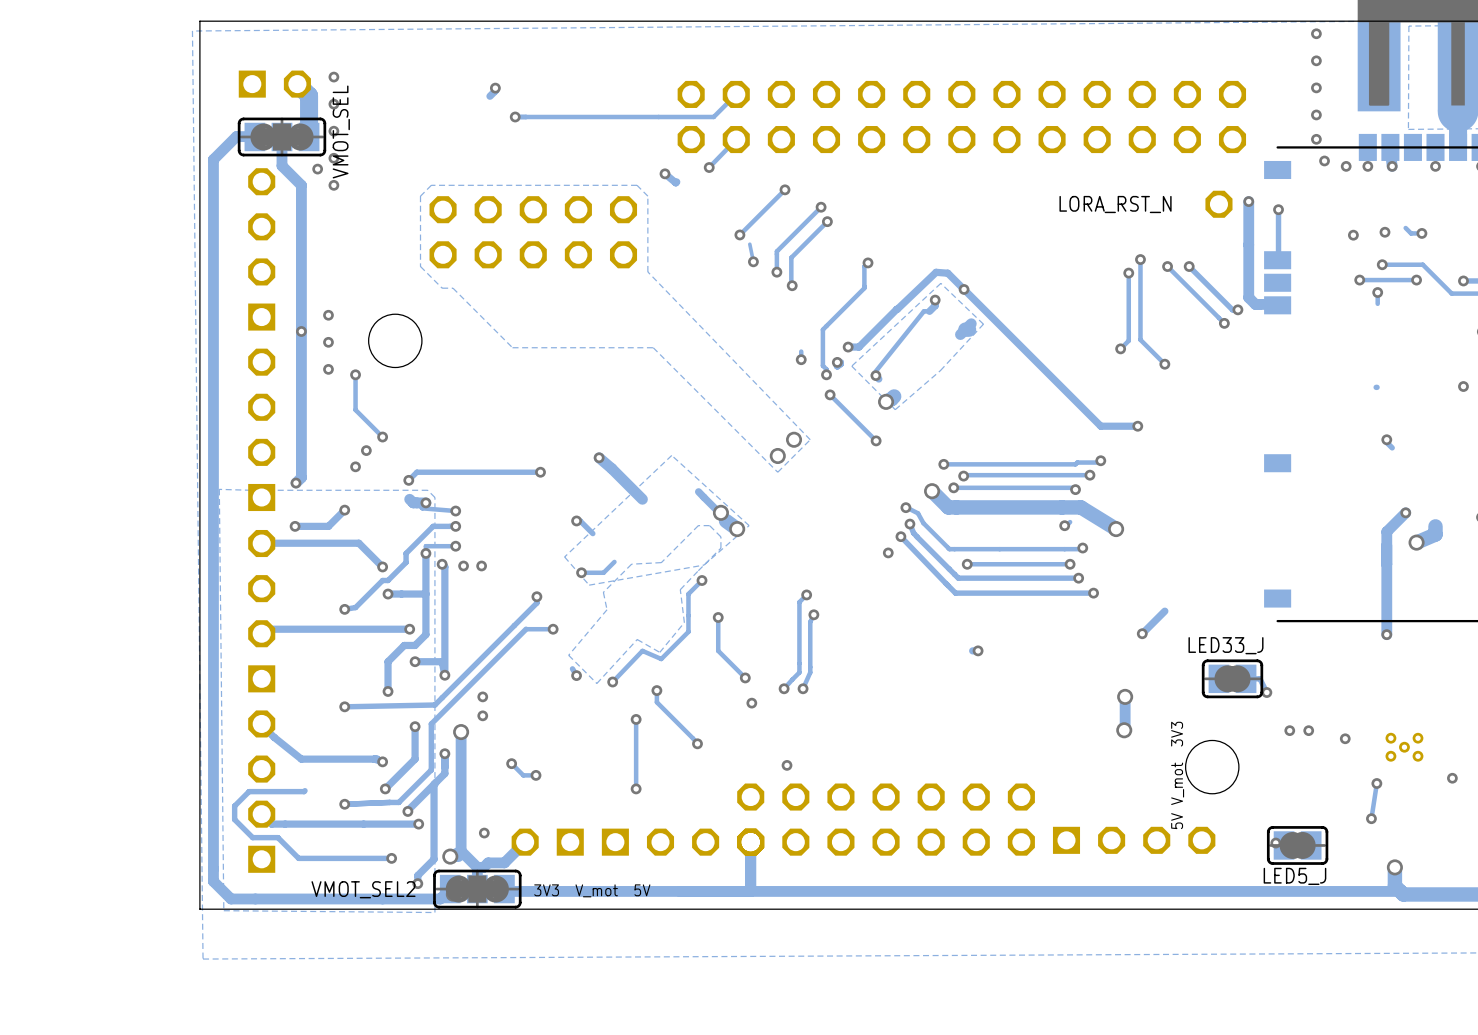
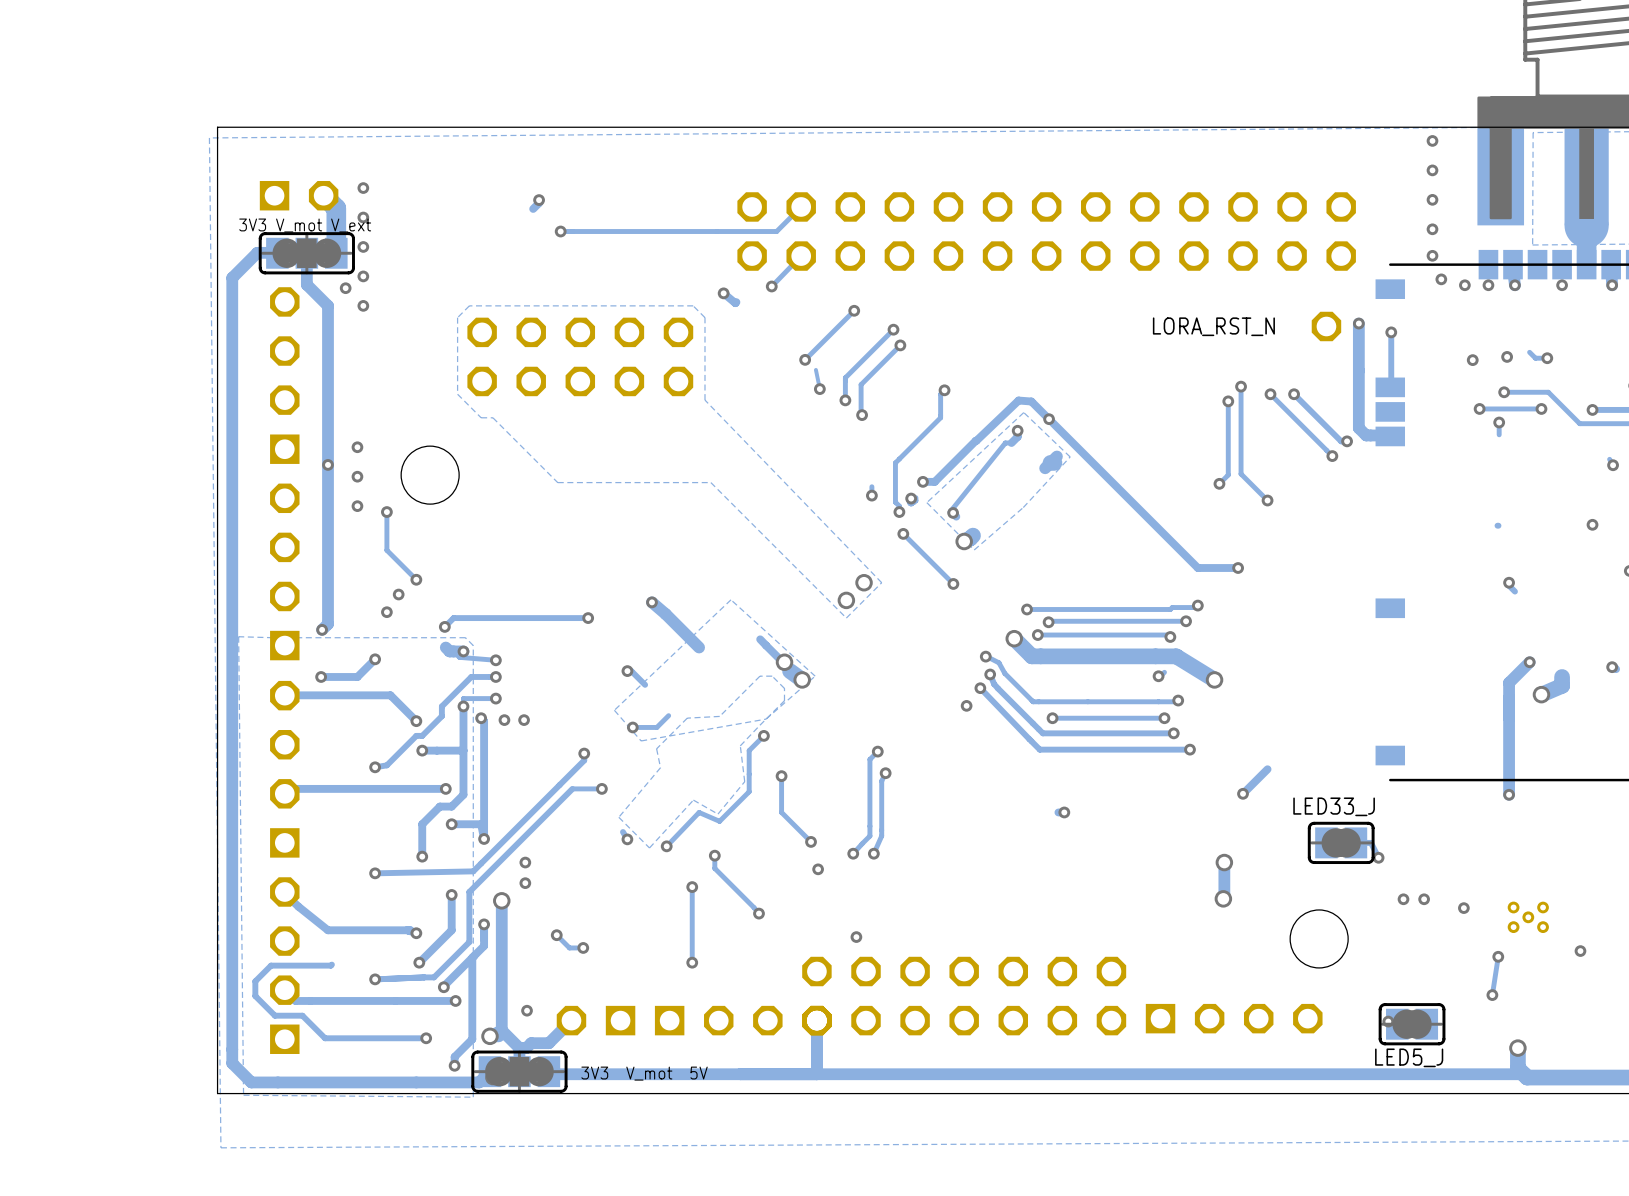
text: none -> 3V3 V_mot V_ext (305, 225)
VMOT_SEL name: VMOT_SEL (341, 131) -> none
text: 5V V_mot 3V3 (1177, 775) -> none
VMOT_SEL2 name: VMOT_SEL2 (363, 889) -> none

